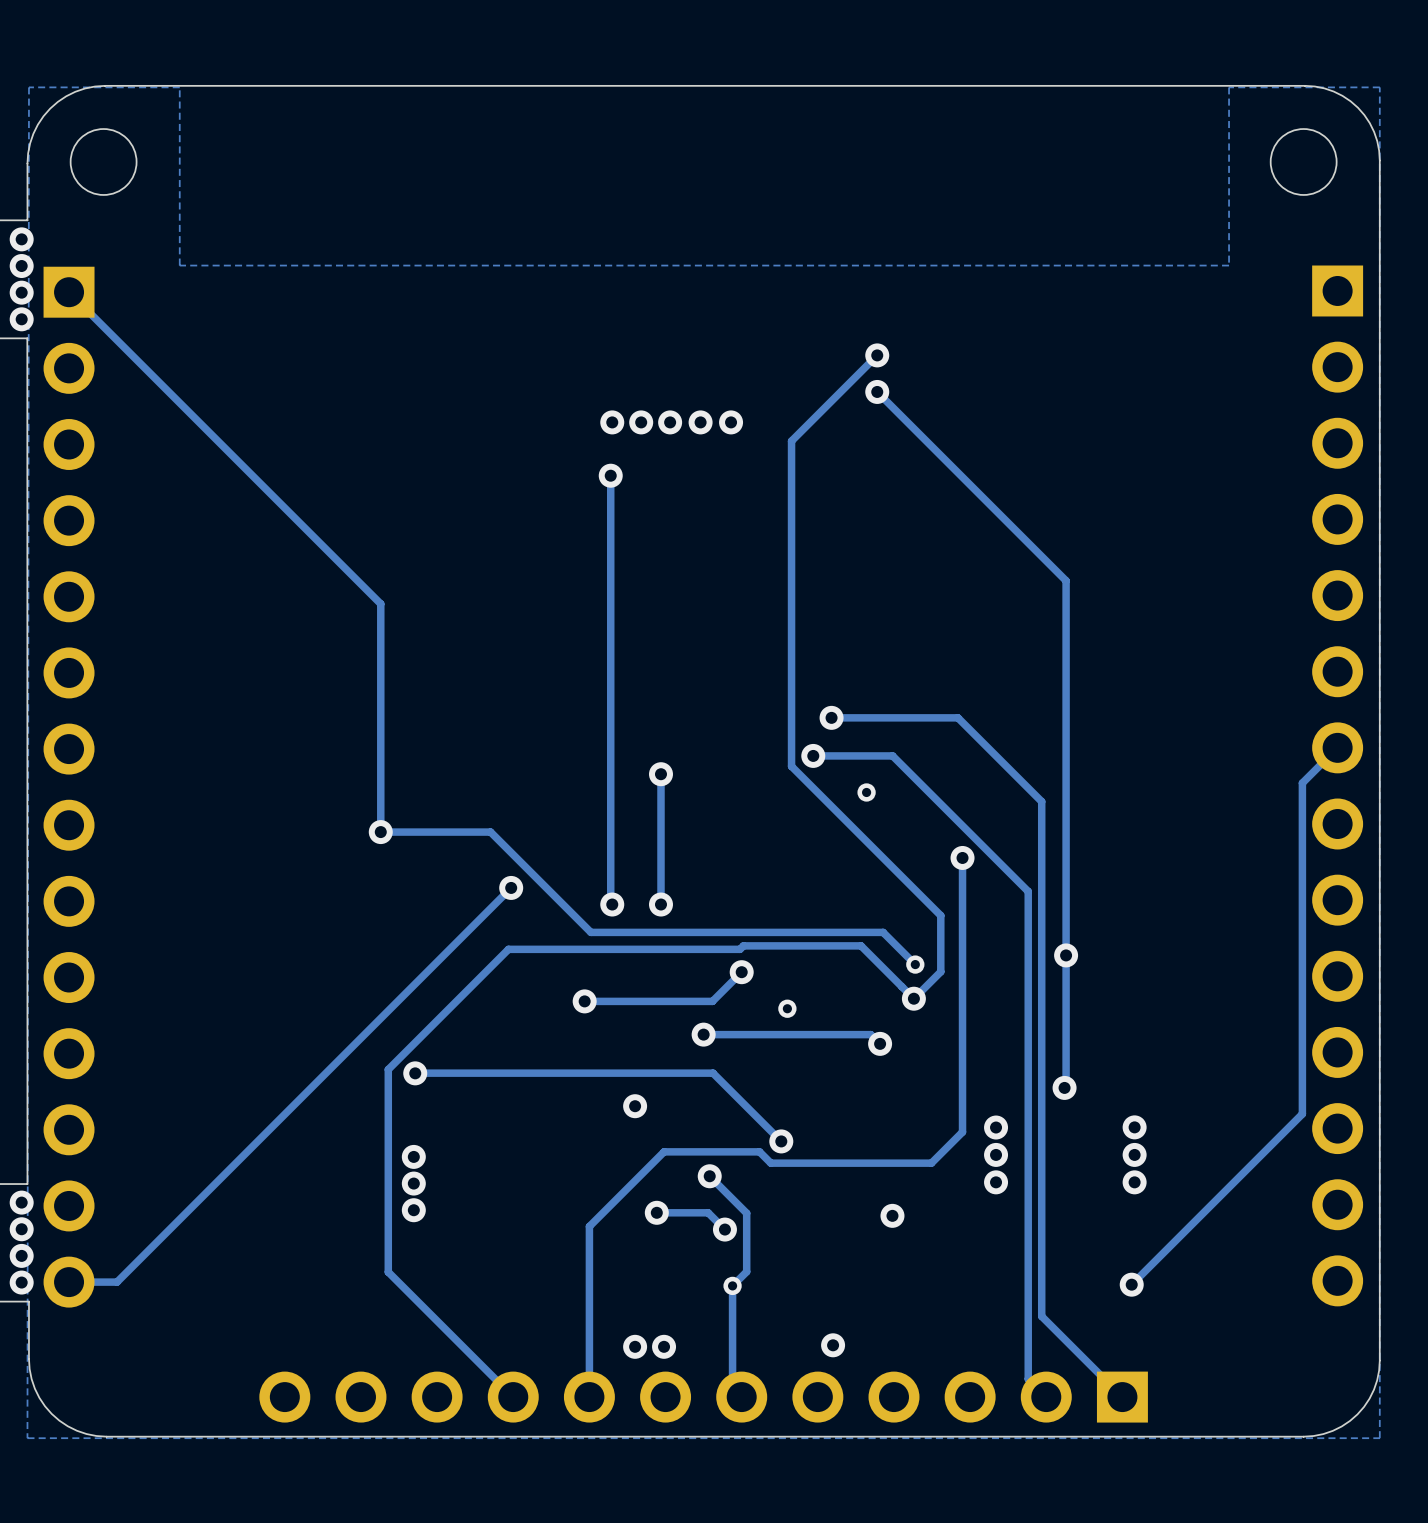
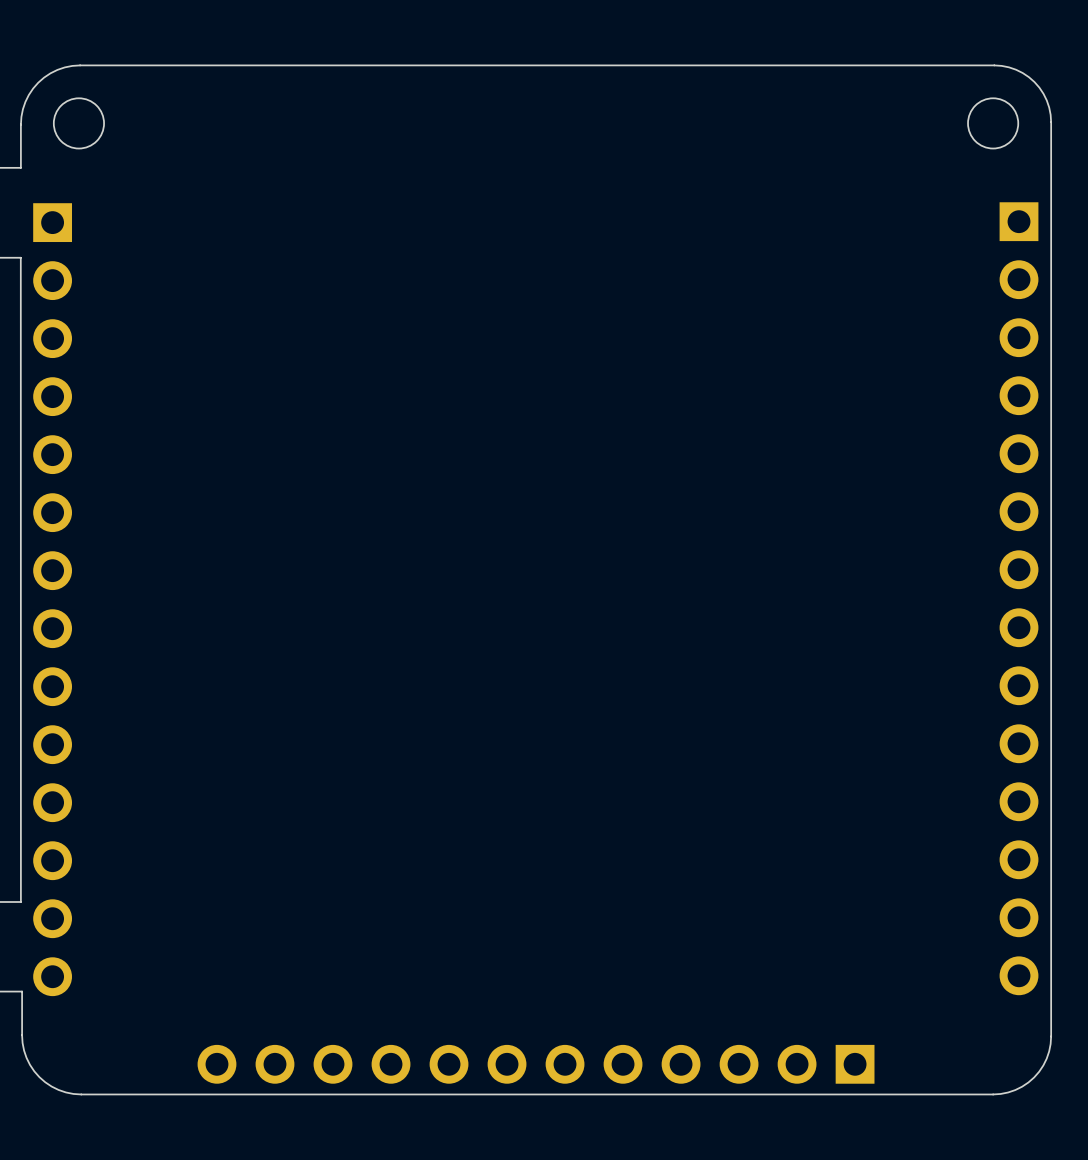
zone outline: (1379, 87) (1229, 87) (1229, 265) (179, 265) (179, 87) (28, 87) (27, 1438) (1379, 1438) (1379, 87) -> none
via: (21, 239) -> none
via: (21, 266) -> none
via: (21, 292) -> none
track: (69, 292) (380, 603) (380, 832) (490, 832) (590, 932) (883, 932) (915, 964) -> none
via: (21, 319) -> none
track: (877, 355) (791, 441) (791, 766) (940, 915) (940, 971) (913, 998) (861, 945) (743, 945) (740, 949) (508, 949) (388, 1069) (388, 1272) (513, 1397) -> none
via: (877, 355) -> none
track: (877, 391) (1066, 580) (1066, 1086) (1064, 1087) -> none
via: (877, 391) -> none
via: (612, 422) -> none
via: (641, 422) -> none
via: (670, 422) -> none
via: (700, 422) -> none
via: (731, 422) -> none
track: (610, 475) (610, 903) (612, 904) -> none
via: (610, 475) -> none
track: (831, 717) (957, 717) (1041, 801) (1041, 1316) (1122, 1397) -> none
via: (831, 717) -> none
track: (1337, 747) (1302, 783) (1302, 1114) (1131, 1284) -> none
track: (813, 755) (892, 755) (1028, 891) (1028, 1379) (1046, 1397) -> none
via: (813, 755) -> none
track: (660, 774) (660, 904) -> none
via: (660, 774) -> none
via: (866, 792) -> none
via: (380, 832) -> none
track: (962, 857) (962, 1132) (931, 1163) (770, 1163) (759, 1151) (664, 1151) (589, 1226) (589, 1397) -> none
via: (962, 857) -> none
track: (511, 887) (117, 1282) (69, 1282) -> none
via: (511, 887) -> none
via: (612, 904) -> none
via: (660, 904) -> none
via: (1066, 955) -> none
via: (915, 964) -> none
track: (741, 972) (712, 1001) (584, 1001) -> none
via: (741, 972) -> none
via: (913, 998) -> none
via: (584, 1001) -> none
via: (787, 1008) -> none
track: (703, 1034) (870, 1034) (880, 1043) -> none
via: (703, 1034) -> none
via: (880, 1043) -> none
track: (411, 1073) (713, 1073) (781, 1141) -> none
via: (415, 1073) -> none
via: (1064, 1087) -> none
via: (635, 1106) -> none
via: (996, 1127) -> none
via: (1134, 1127) -> none
via: (781, 1141) -> none
via: (996, 1154) -> none
via: (1134, 1154) -> none
via: (413, 1156) -> none
track: (709, 1176) (746, 1213) (746, 1271) (732, 1285) (732, 1387) -> none
via: (709, 1176) -> none
via: (996, 1182) -> none
via: (1134, 1182) -> none
via: (413, 1183) -> none
via: (21, 1202) -> none
via: (413, 1210) -> none
track: (656, 1212) (708, 1212) (724, 1229) -> none
via: (656, 1212) -> none
via: (892, 1215) -> none
via: (21, 1229) -> none
via: (724, 1229) -> none
via: (21, 1255) -> none
via: (21, 1282) -> none
via: (1131, 1284) -> none
via: (732, 1285) -> none
via: (833, 1345) -> none
via: (635, 1346) -> none
via: (664, 1346) -> none

